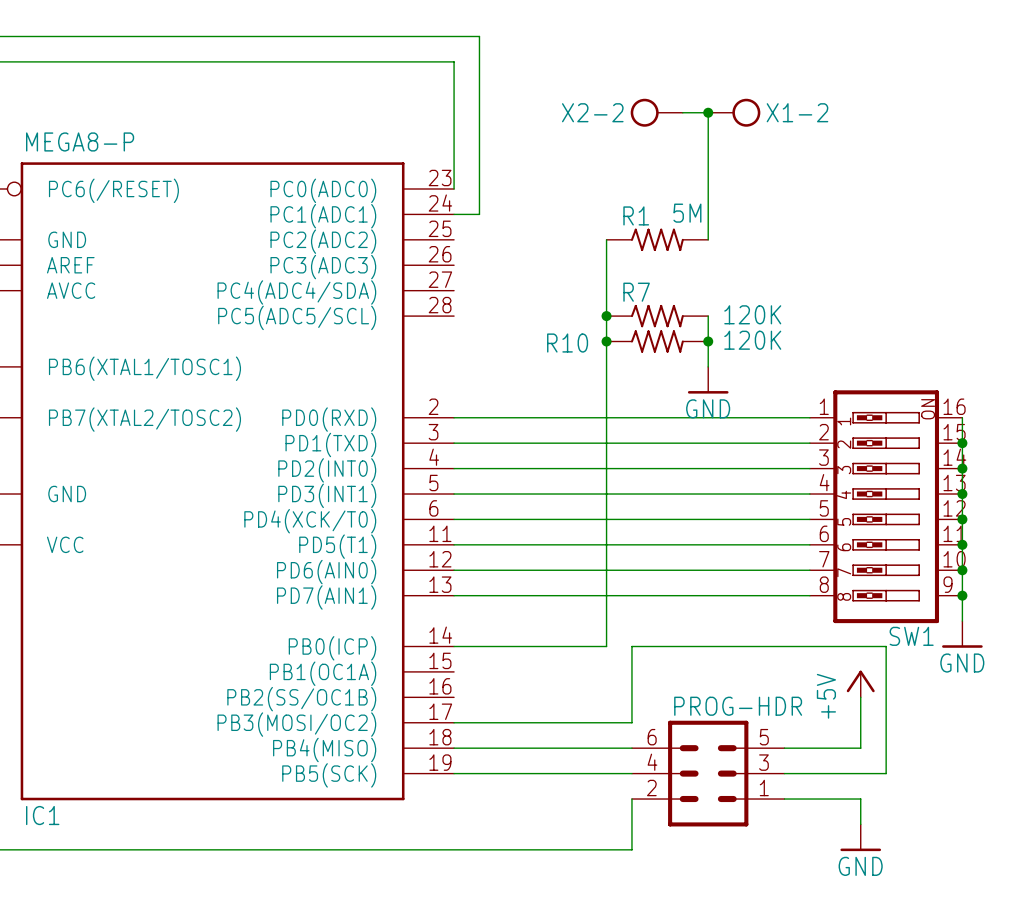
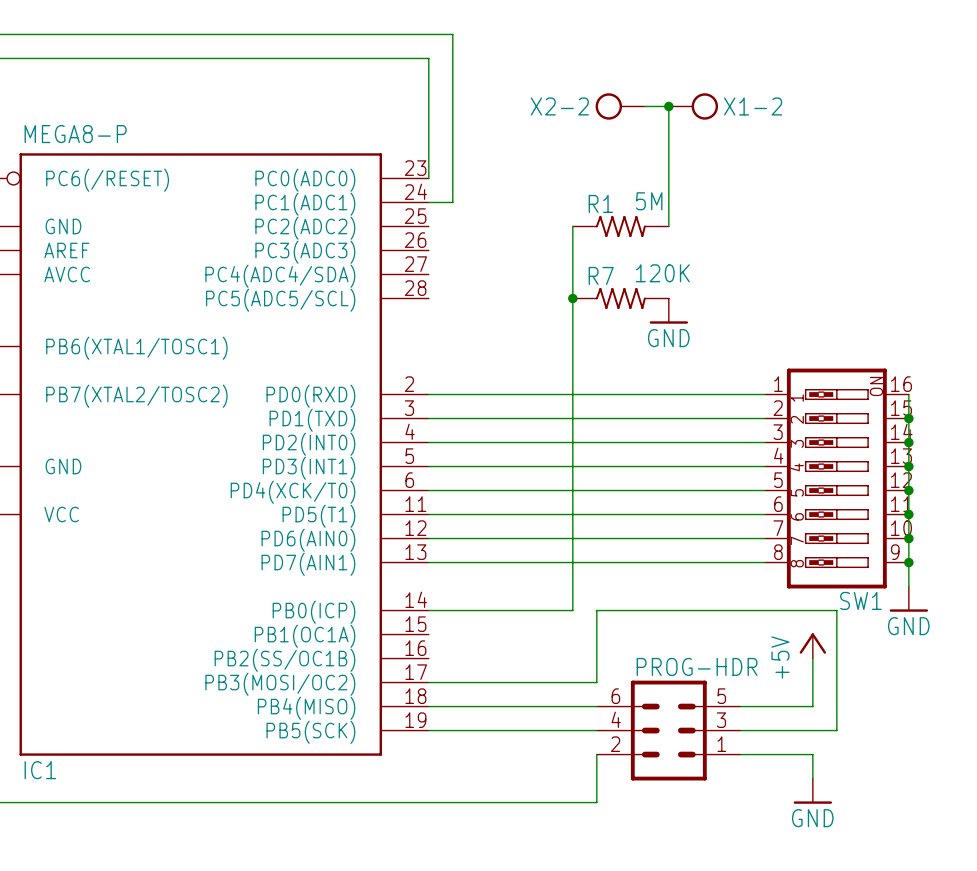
R7 value position: 120K (752, 314) -> 120K (662, 273)
junction: (606, 341) -> none
R10: 120K (657, 341) -> none
junction: (708, 341) -> none
power symbol position: GND (708, 380) -> GND (668, 311)

